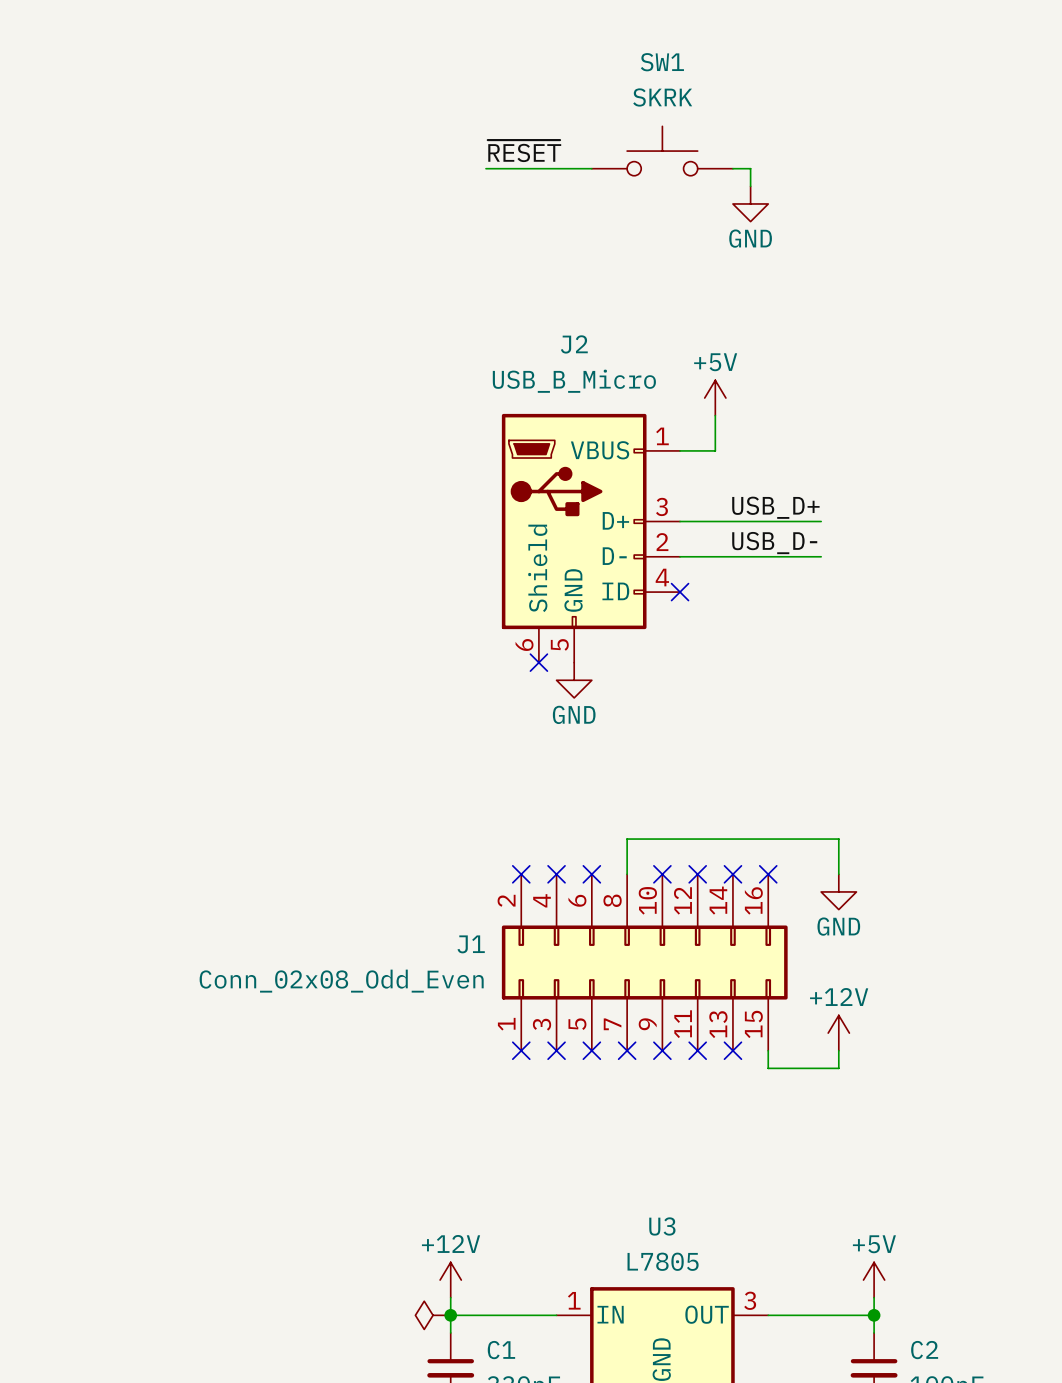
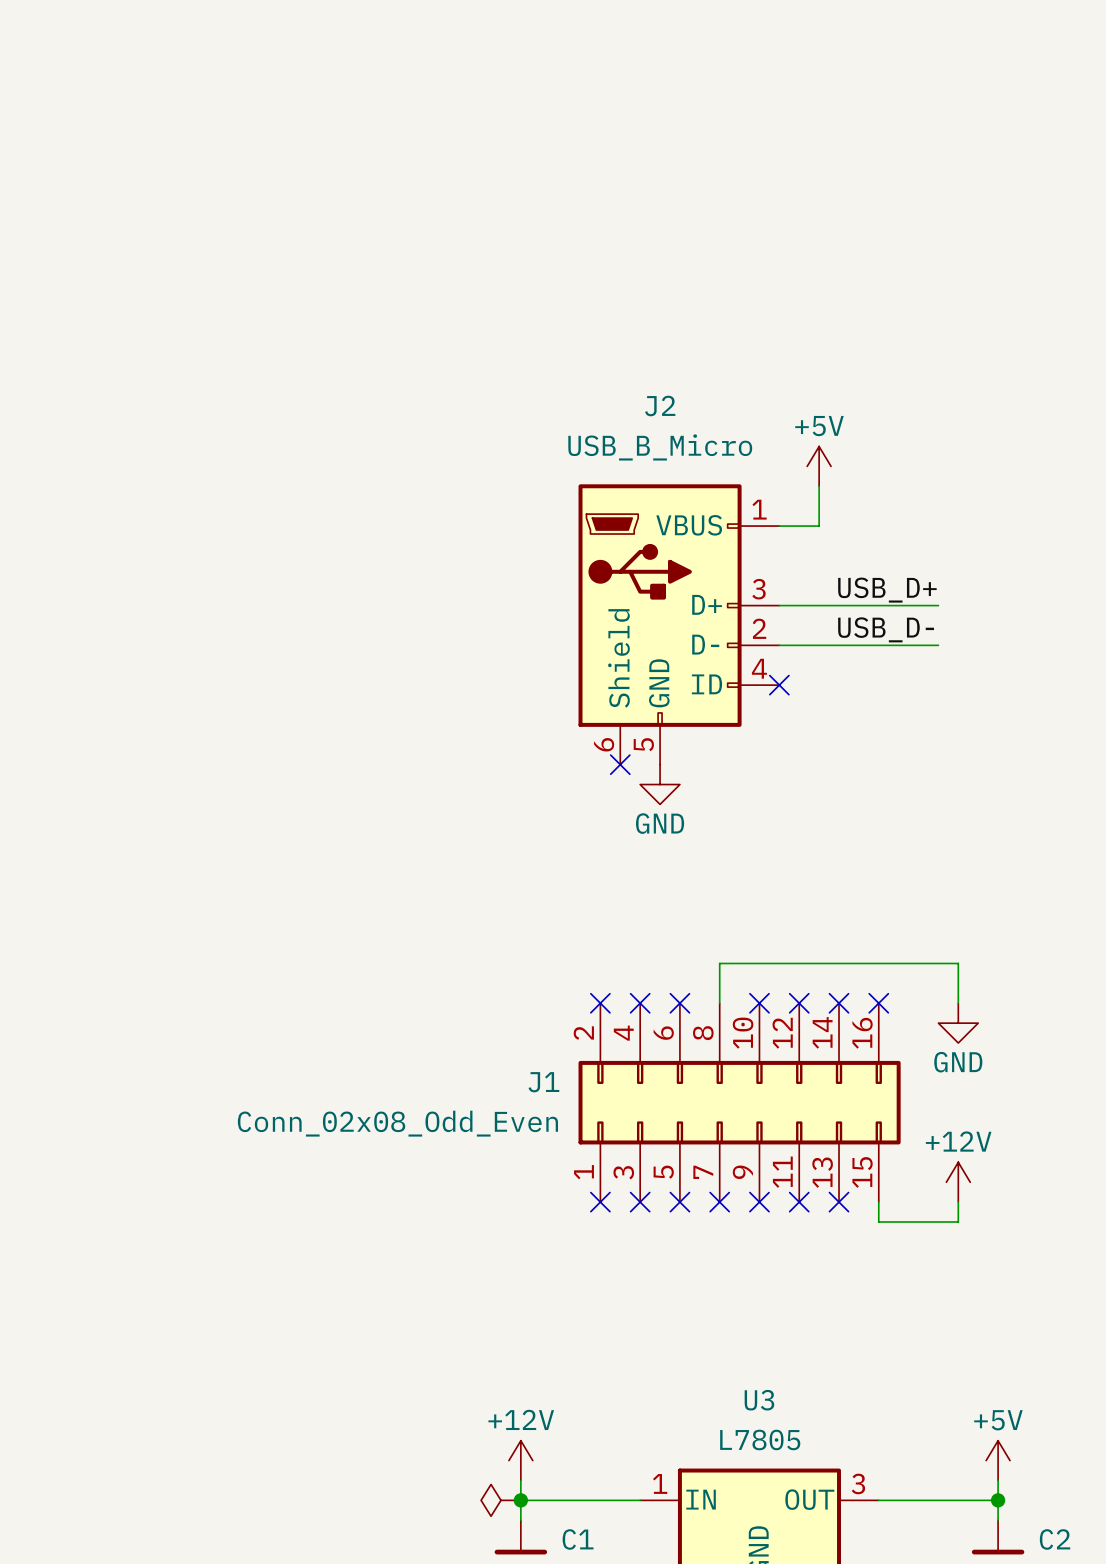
label: ~{RESET} (524, 151) -> none
SW1: SKRK (662, 151) -> none
wire: (485, 168) (591, 168) -> none
wire: (732, 168) (750, 168) (750, 186) -> none
power symbol: GND (750, 203) -> none

